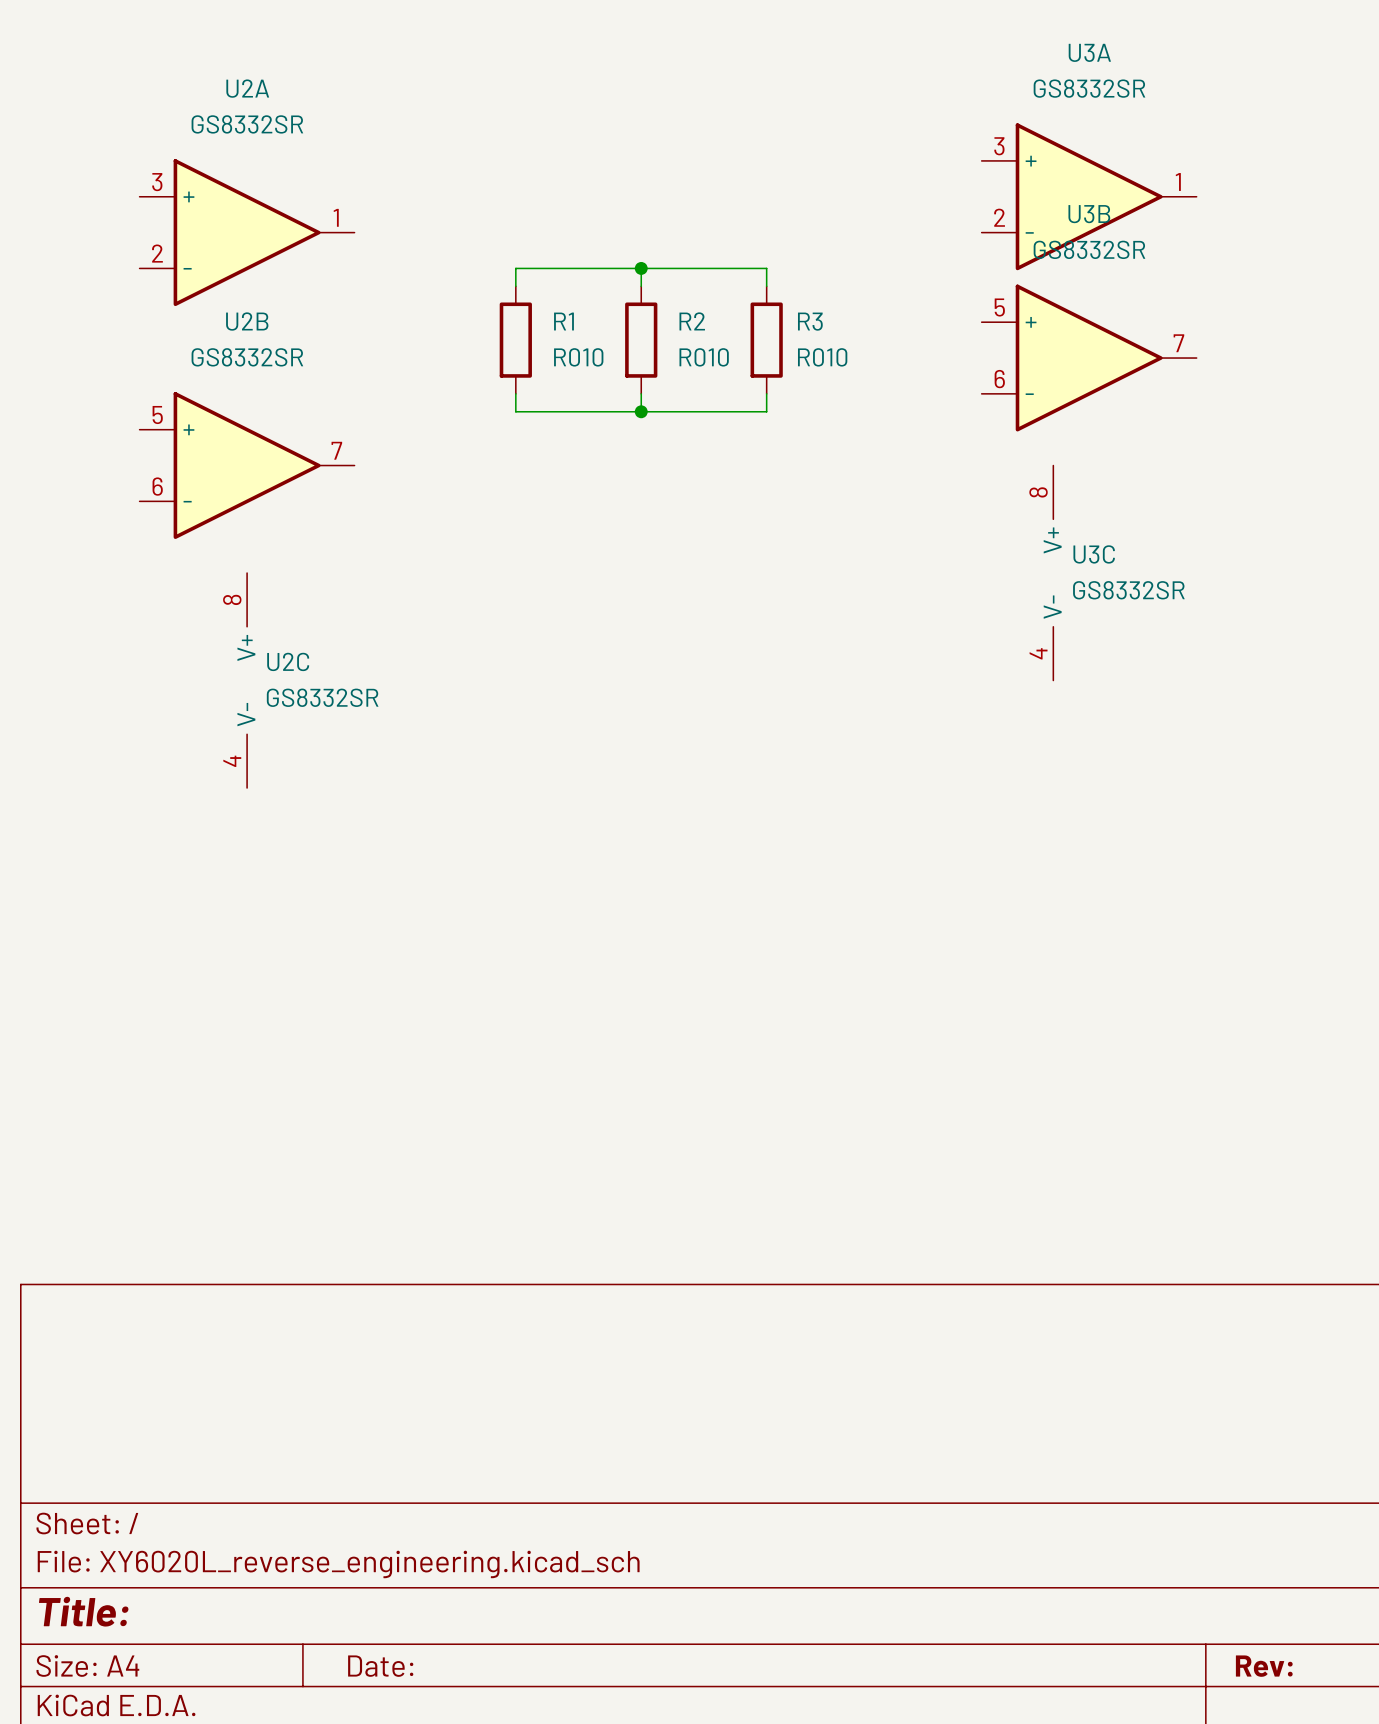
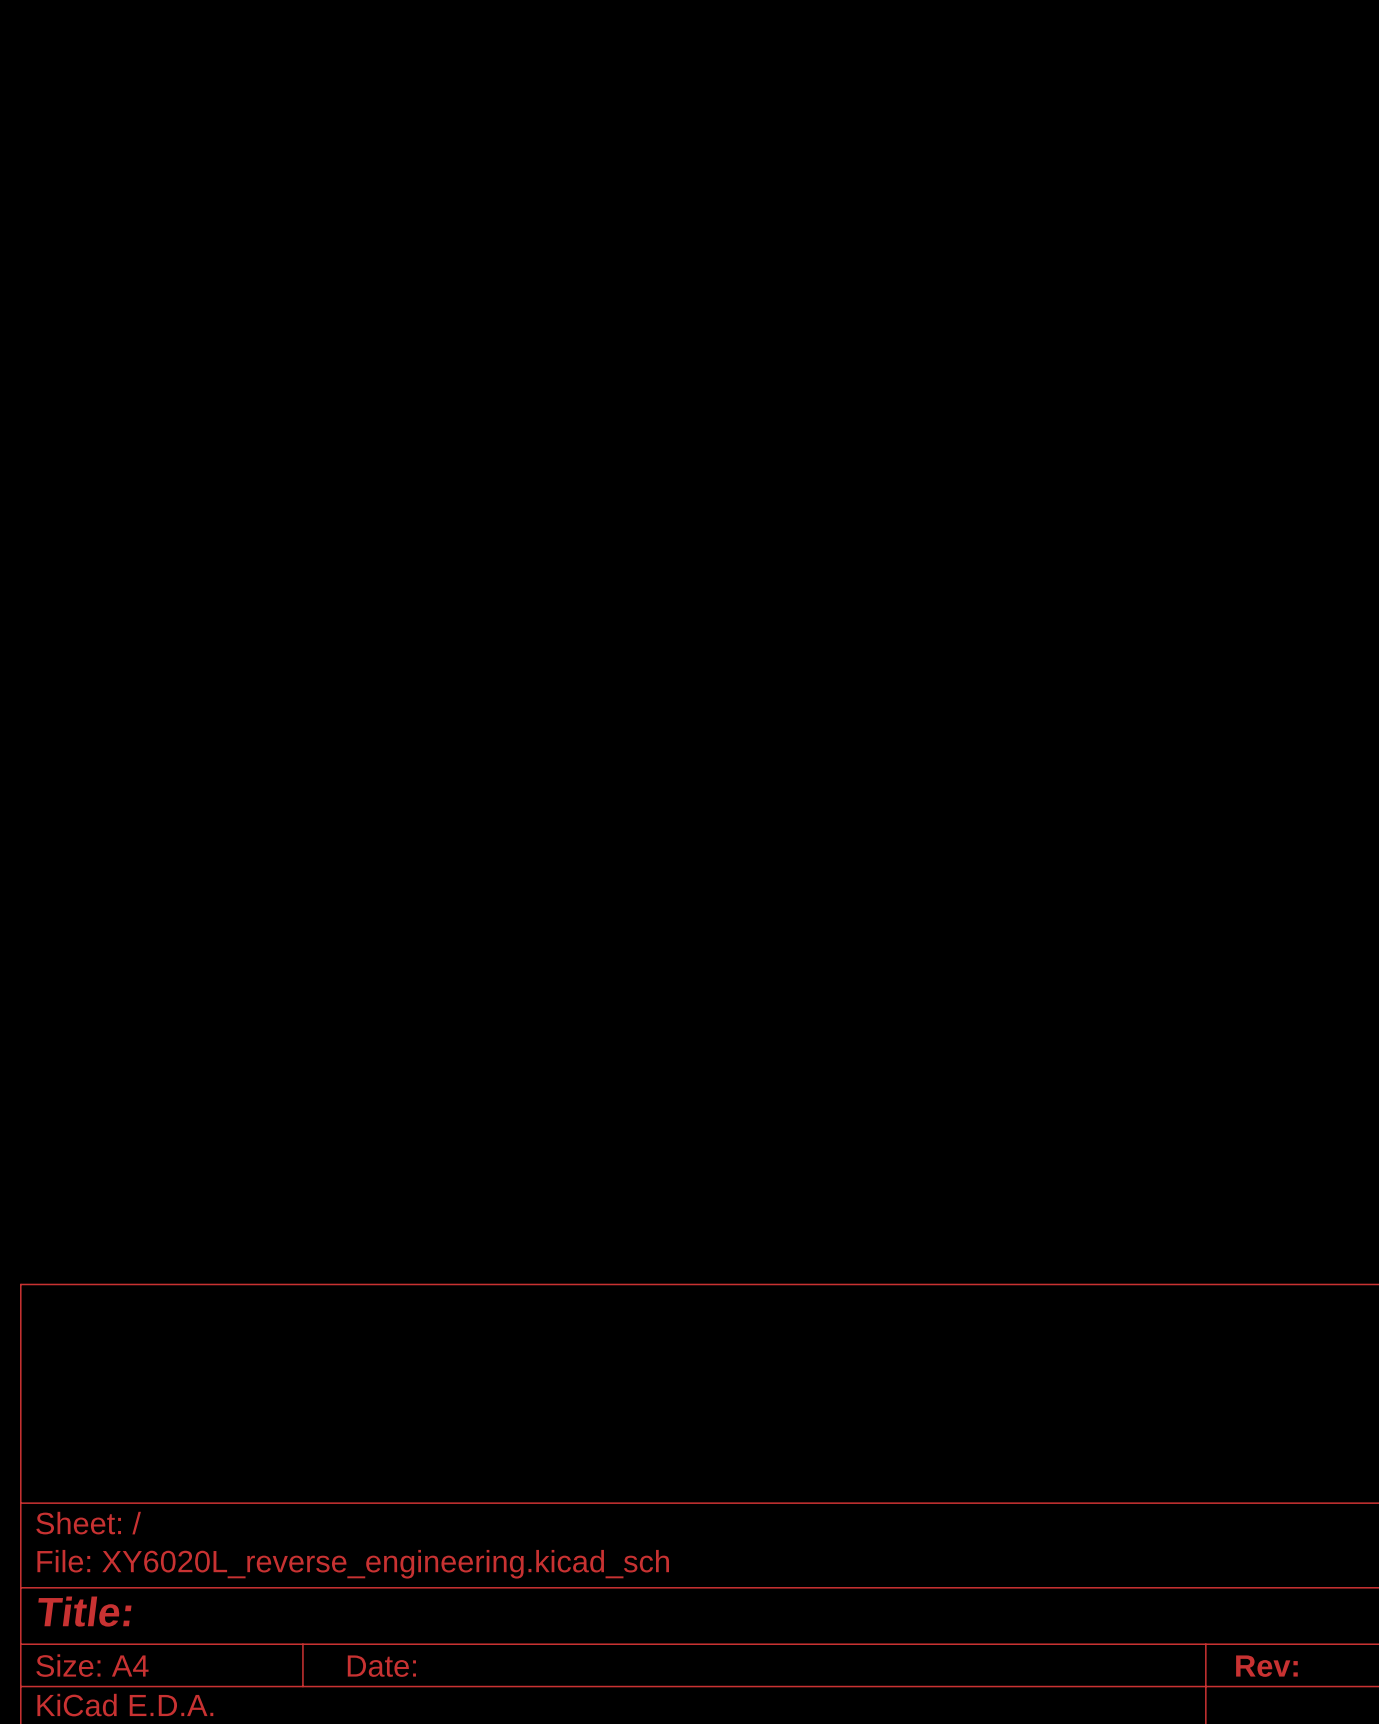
U3A: GS8332SR (1089, 196) -> none
U2A: GS8332SR (247, 232) -> none
wire: (641, 268) (641, 286) -> none
junction: (641, 268) -> none
wire: (515, 286) (515, 268) (766, 268) (766, 286) -> none
R1: R010 (515, 340) -> none
R2: R010 (641, 340) -> none
R3: R010 (766, 340) -> none
U3B: GS8332SR (1089, 358) -> none
wire: (515, 393) (515, 411) (766, 411) (766, 393) -> none
wire: (641, 393) (641, 411) -> none
junction: (641, 411) -> none
U2B: GS8332SR (247, 465) -> none
U3C: GS8332SR (1053, 573) -> none
U2C: GS8332SR (247, 680) -> none

